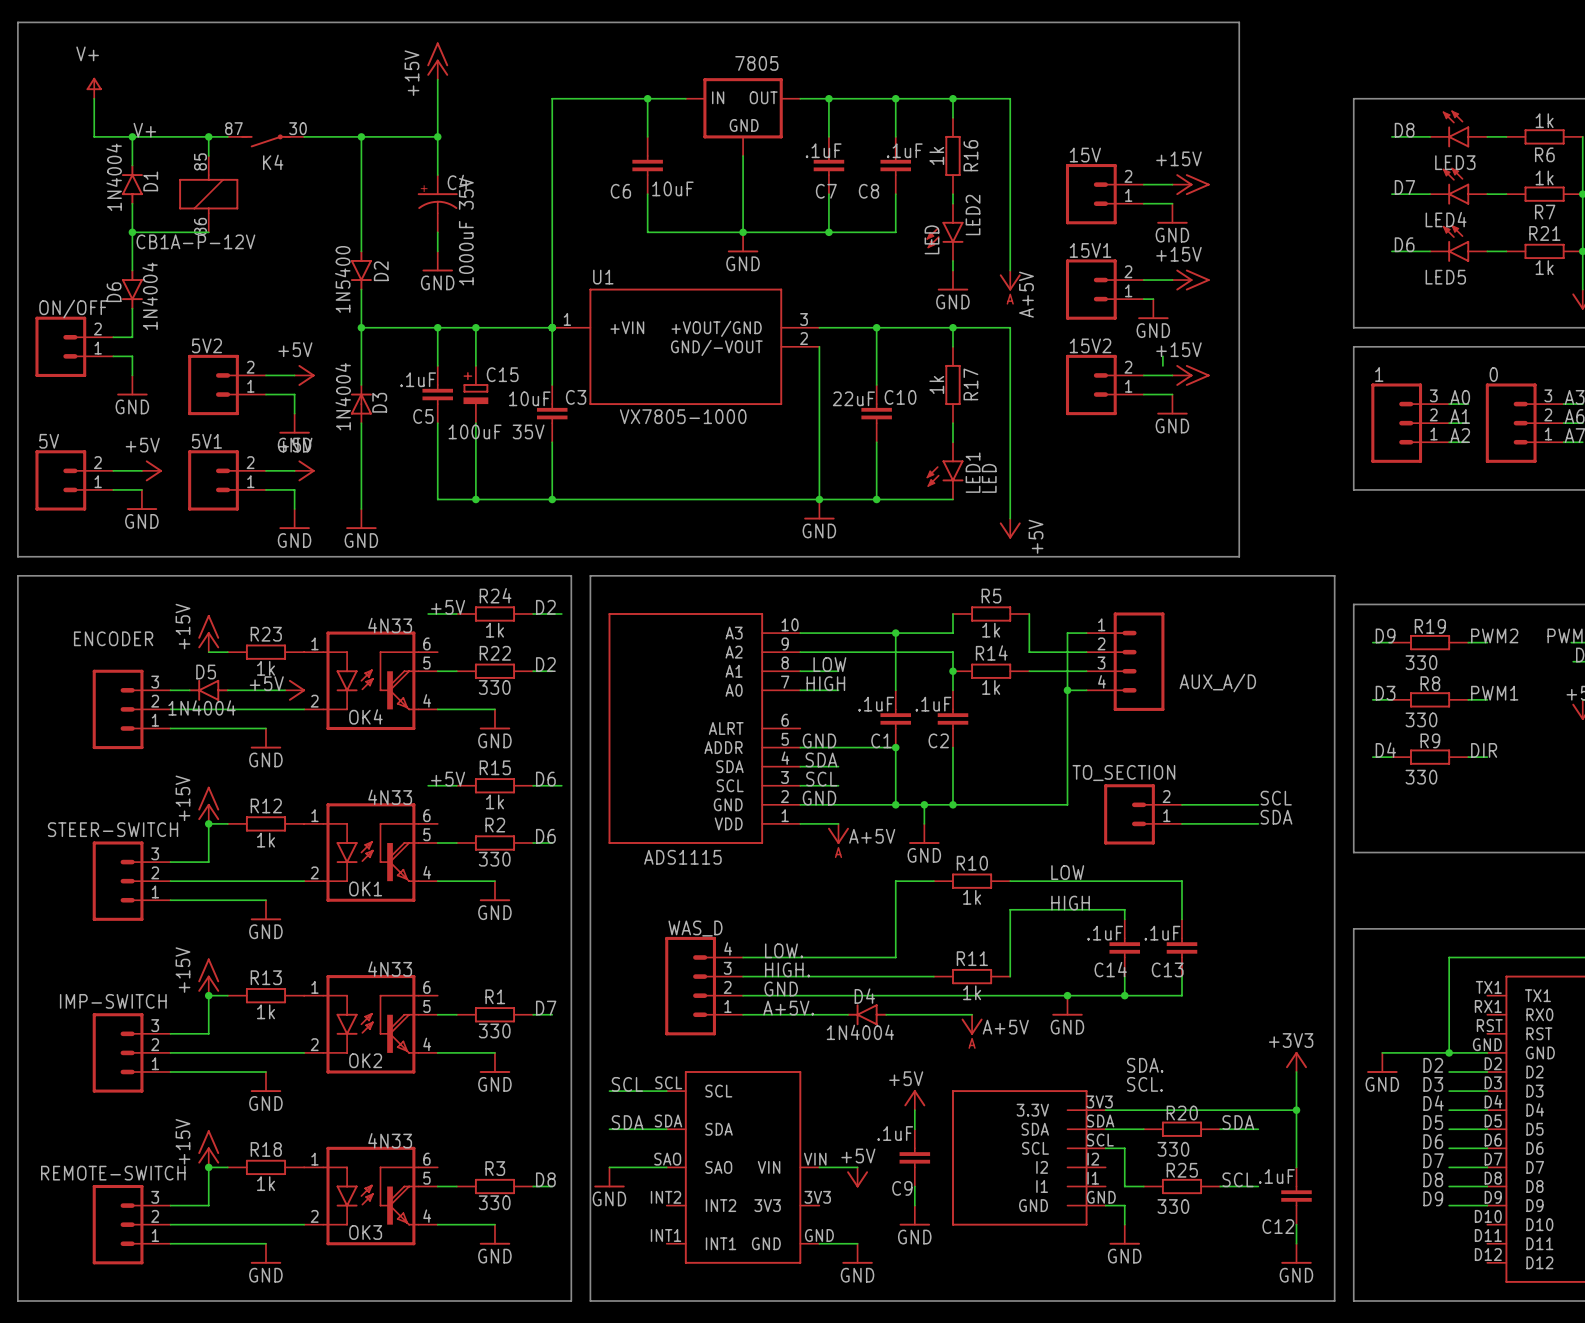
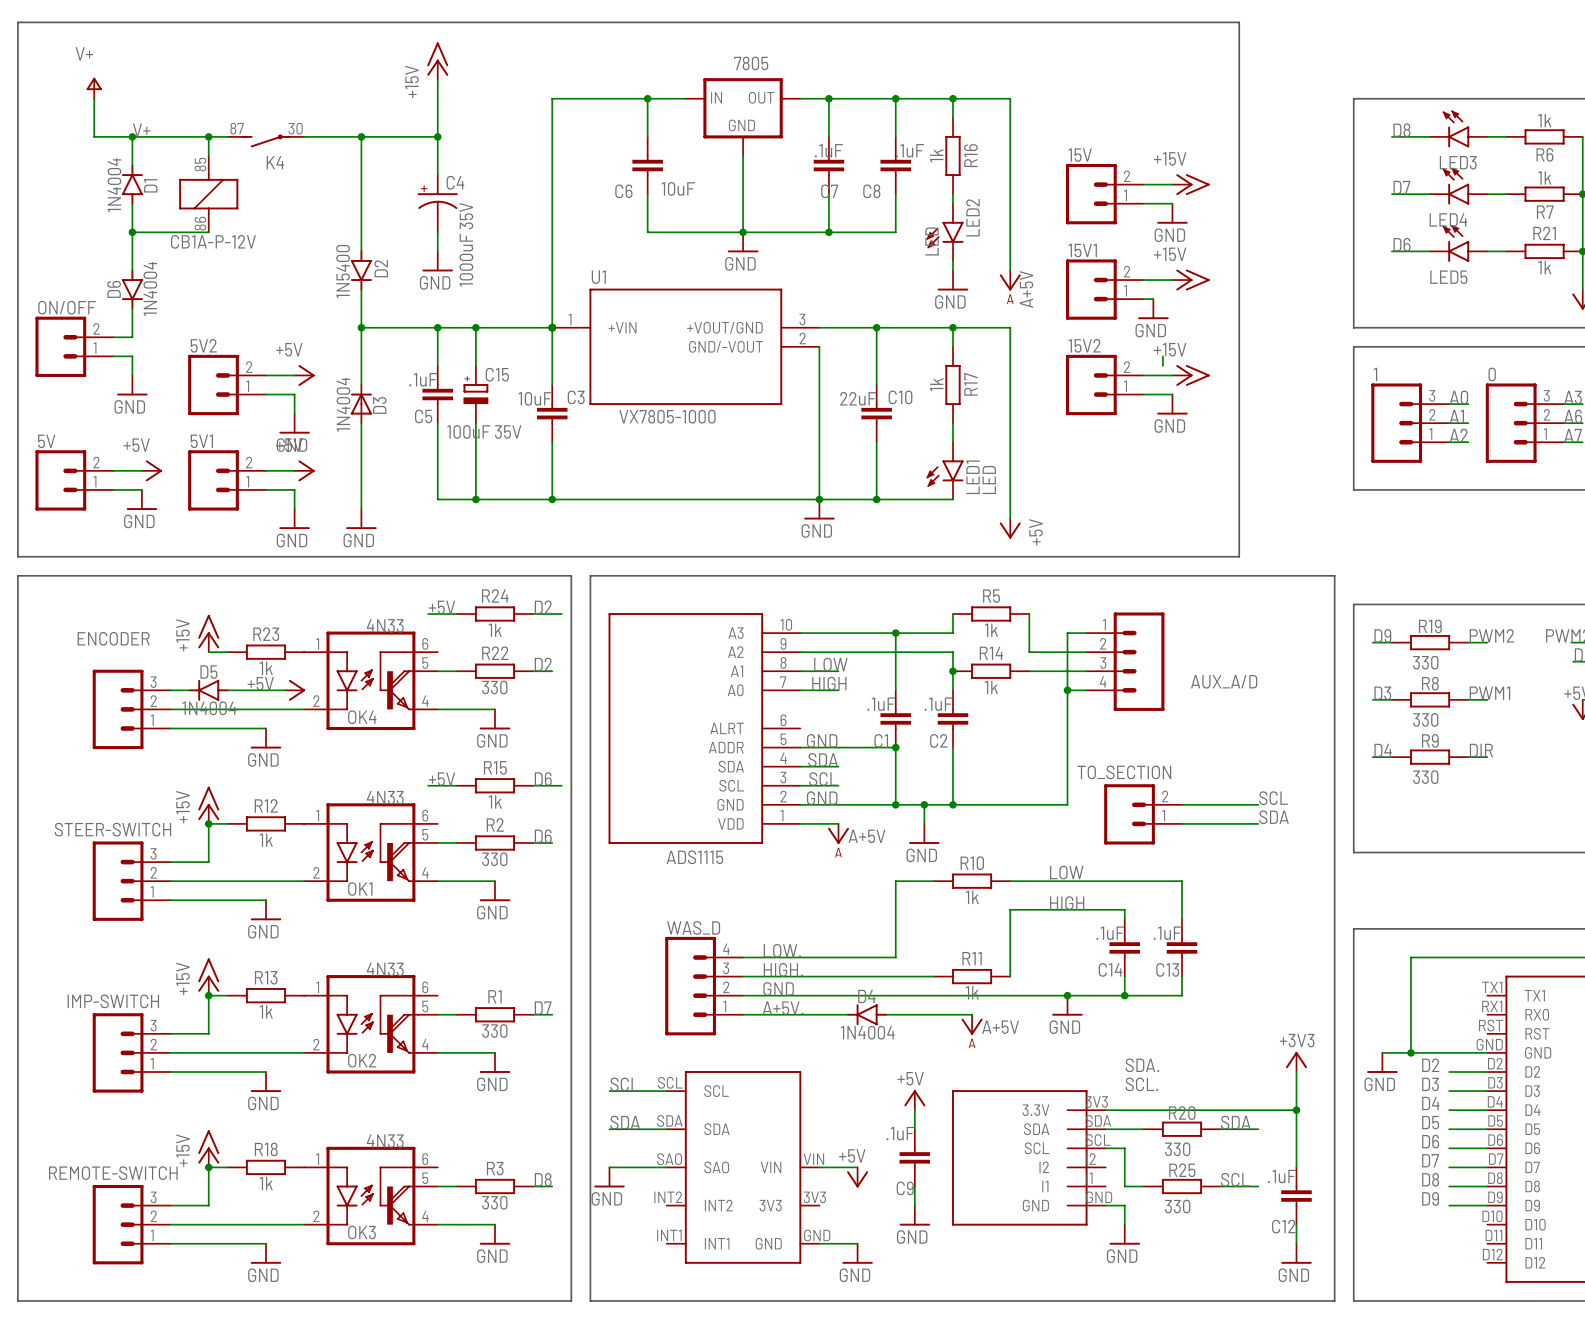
wire: (1449, 957) (1449, 1052) -> (1449, 957) (1410, 957) (1410, 1052)
junction position: (1449, 1052) -> (1410, 1052)

